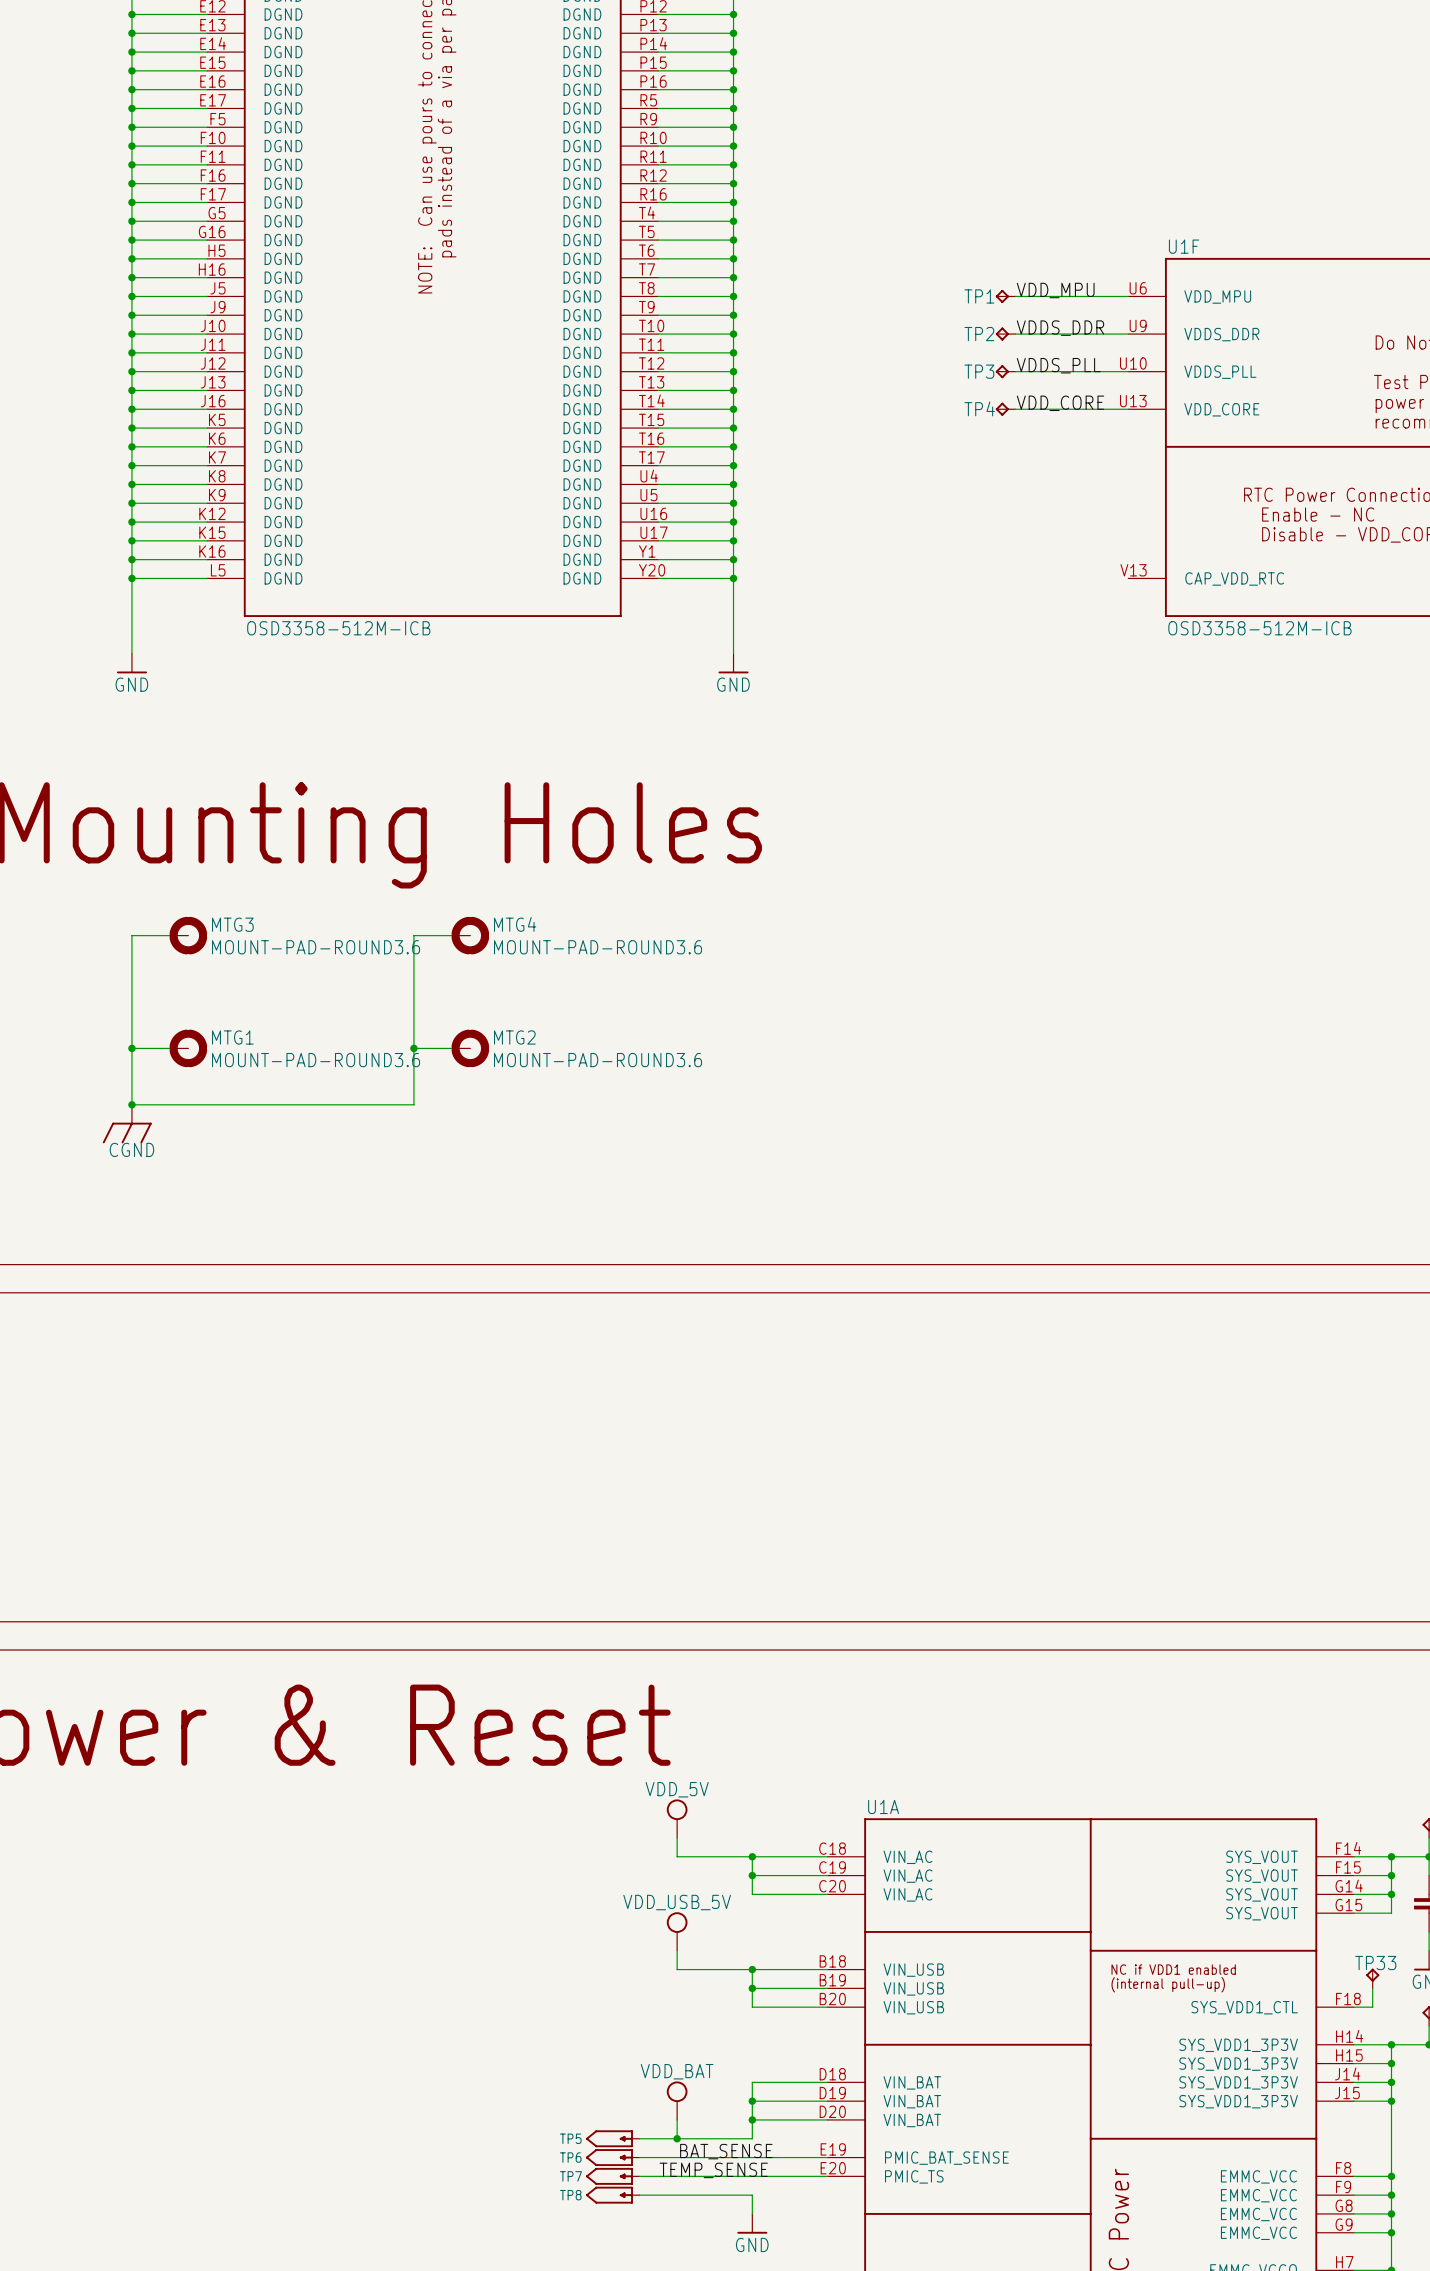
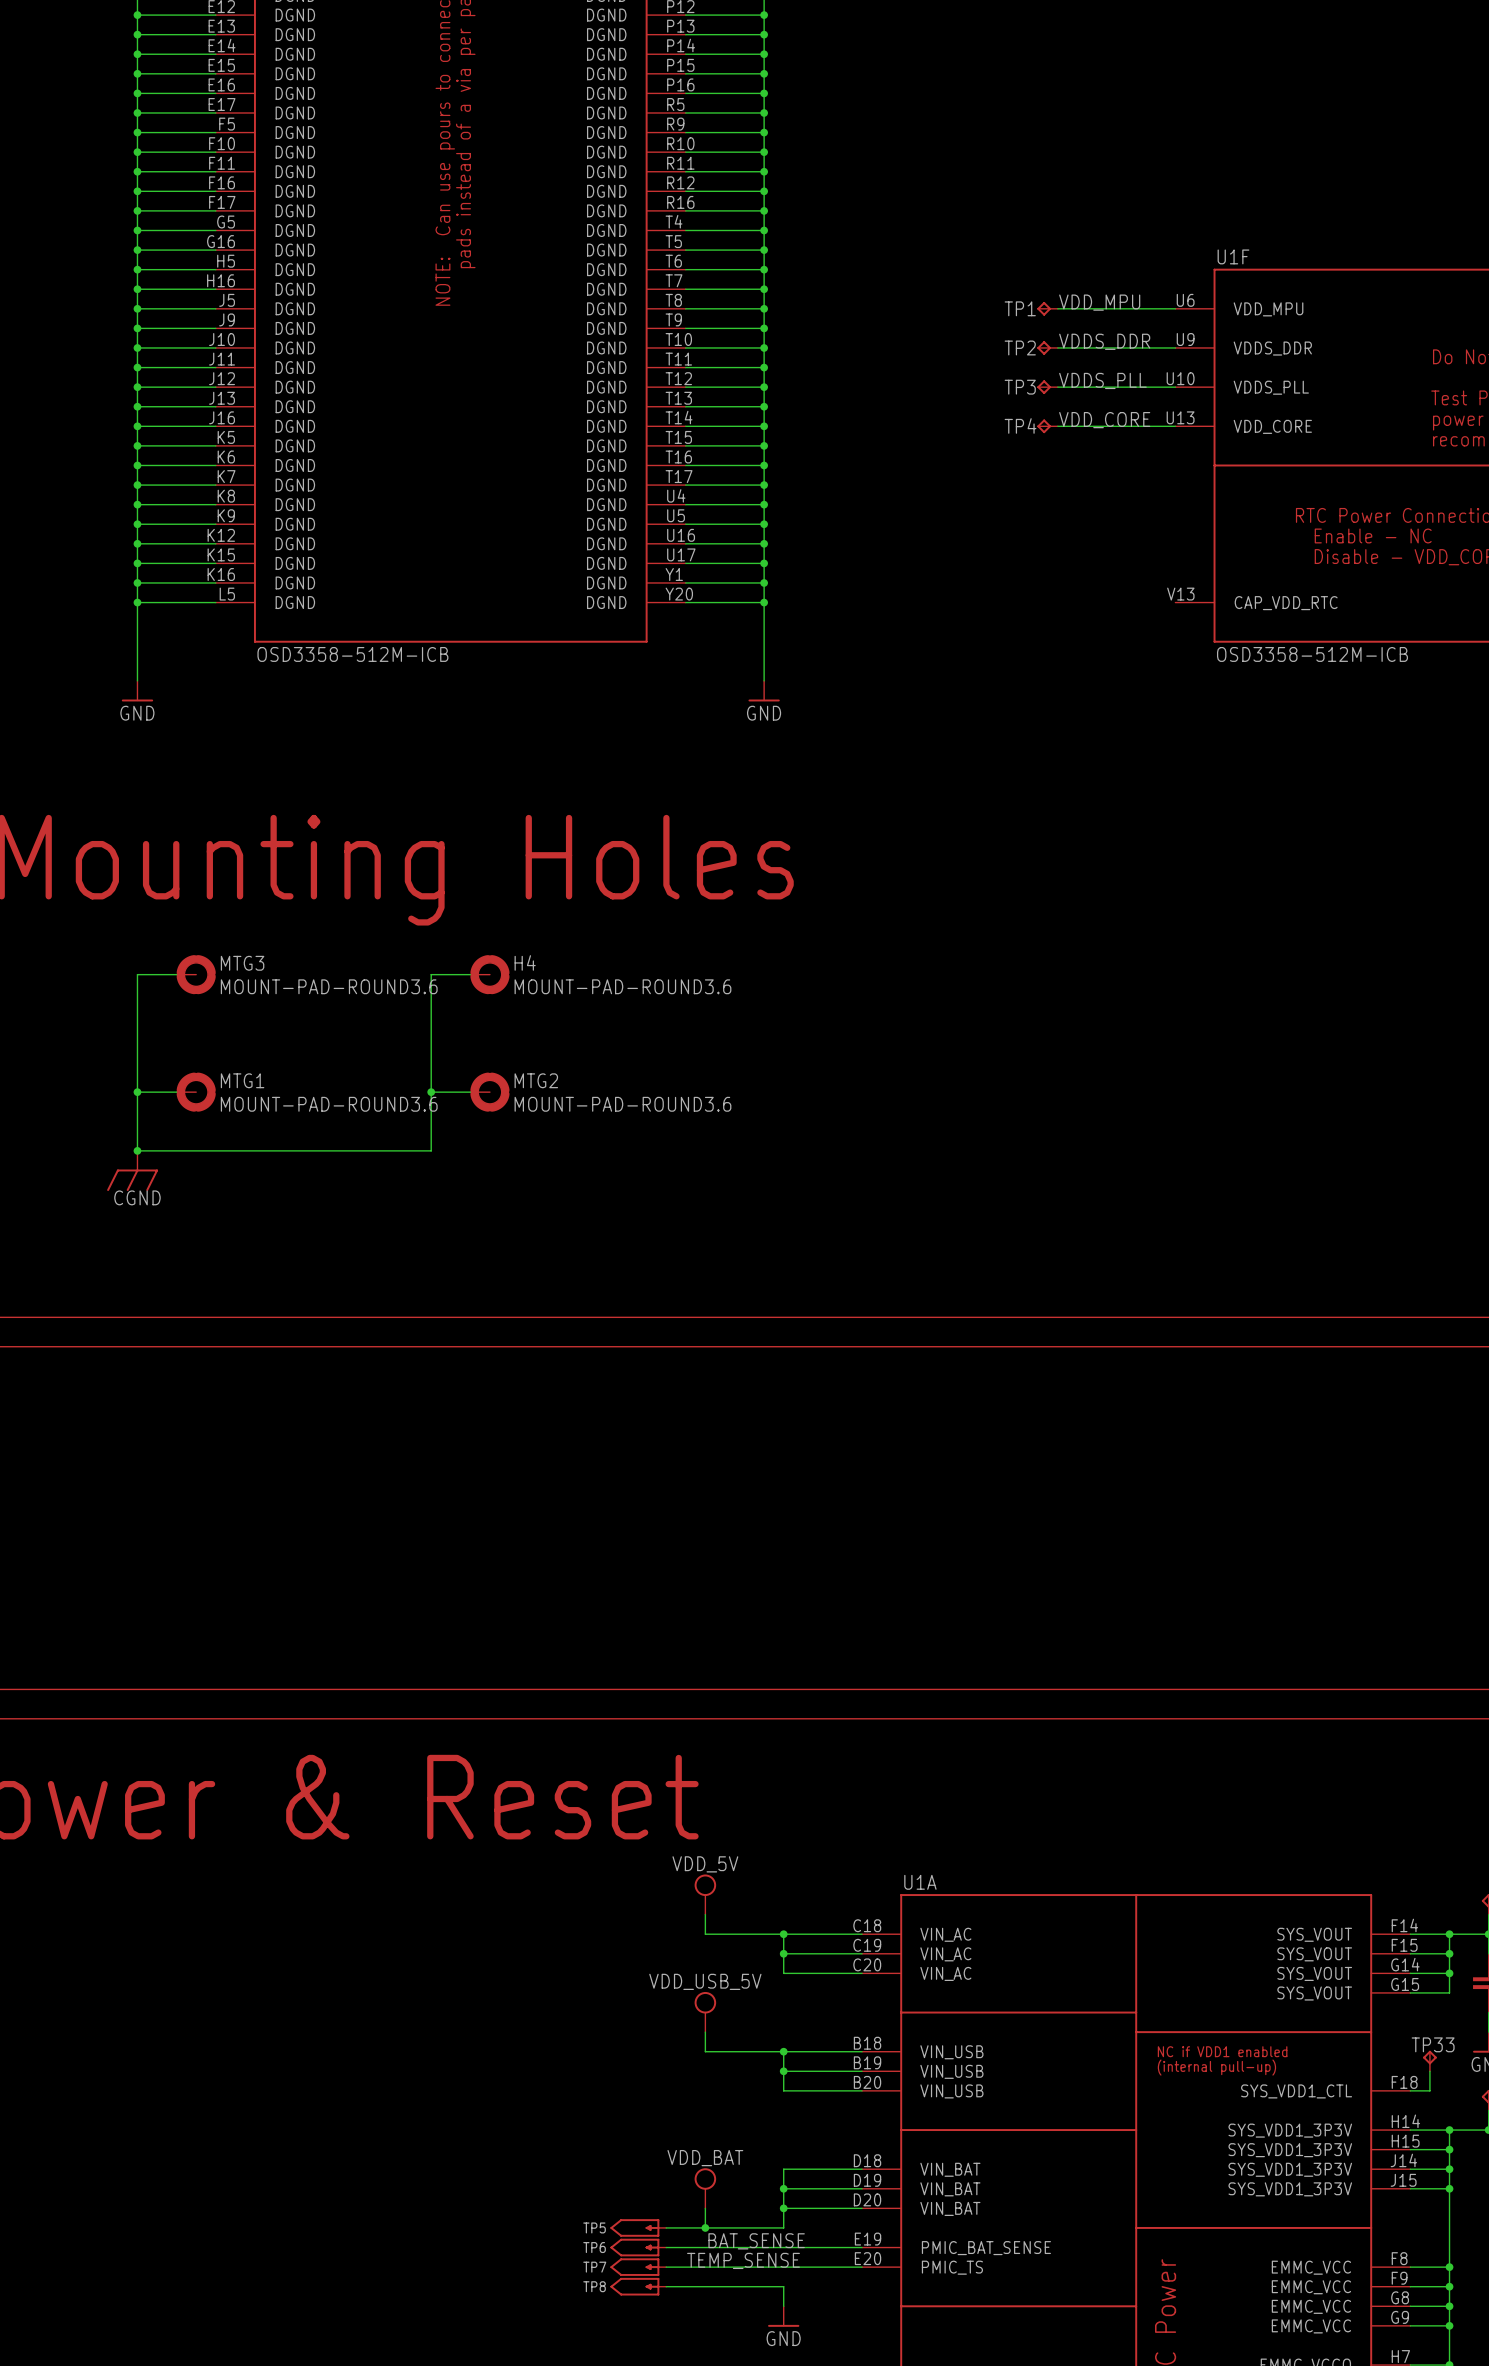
MTG4 name: MTG4 (515, 924) -> H4 (525, 962)

